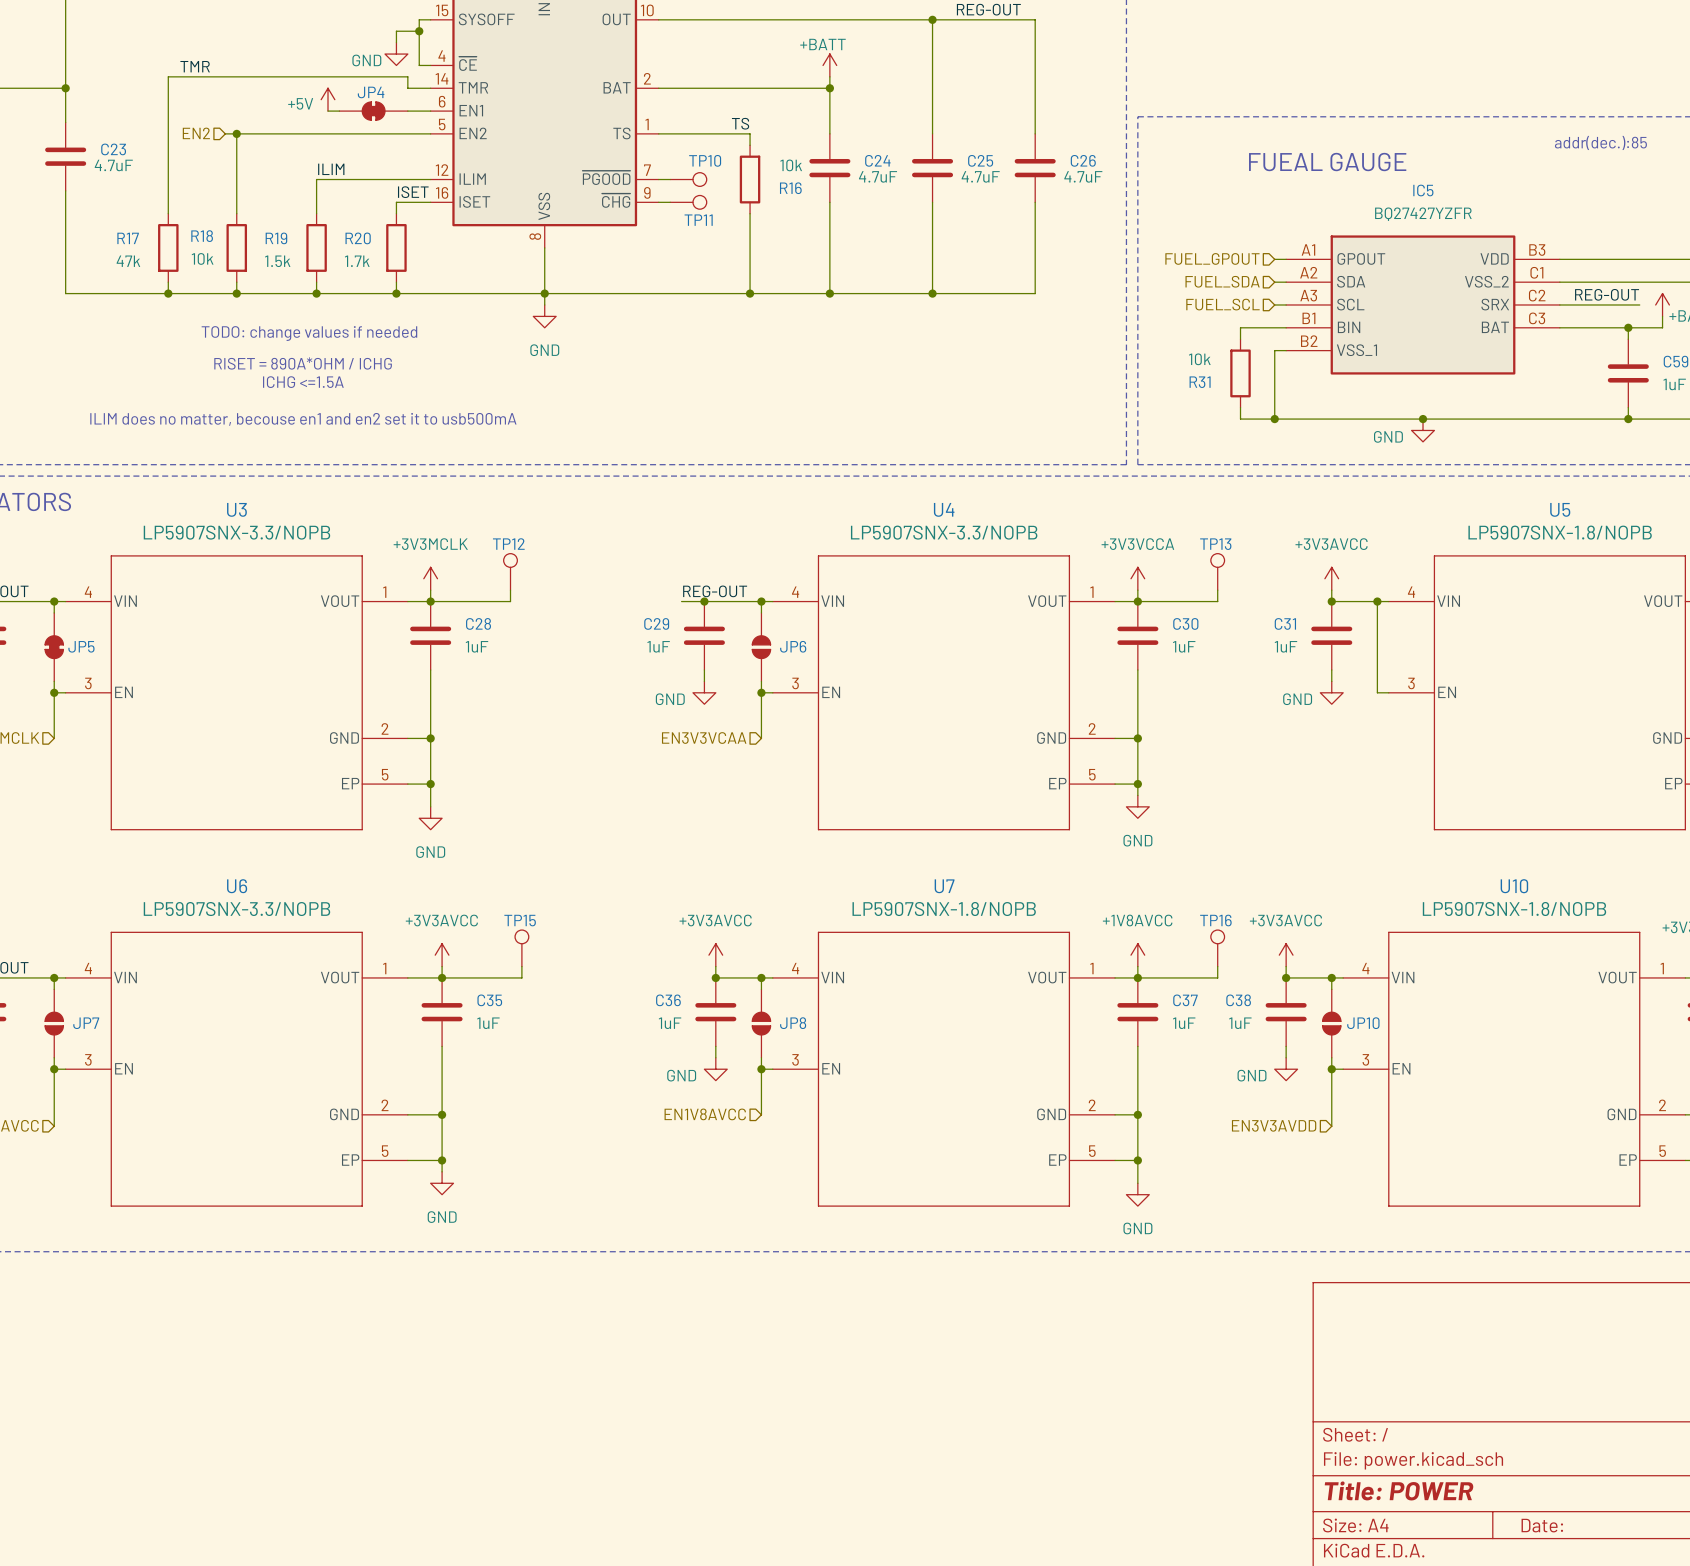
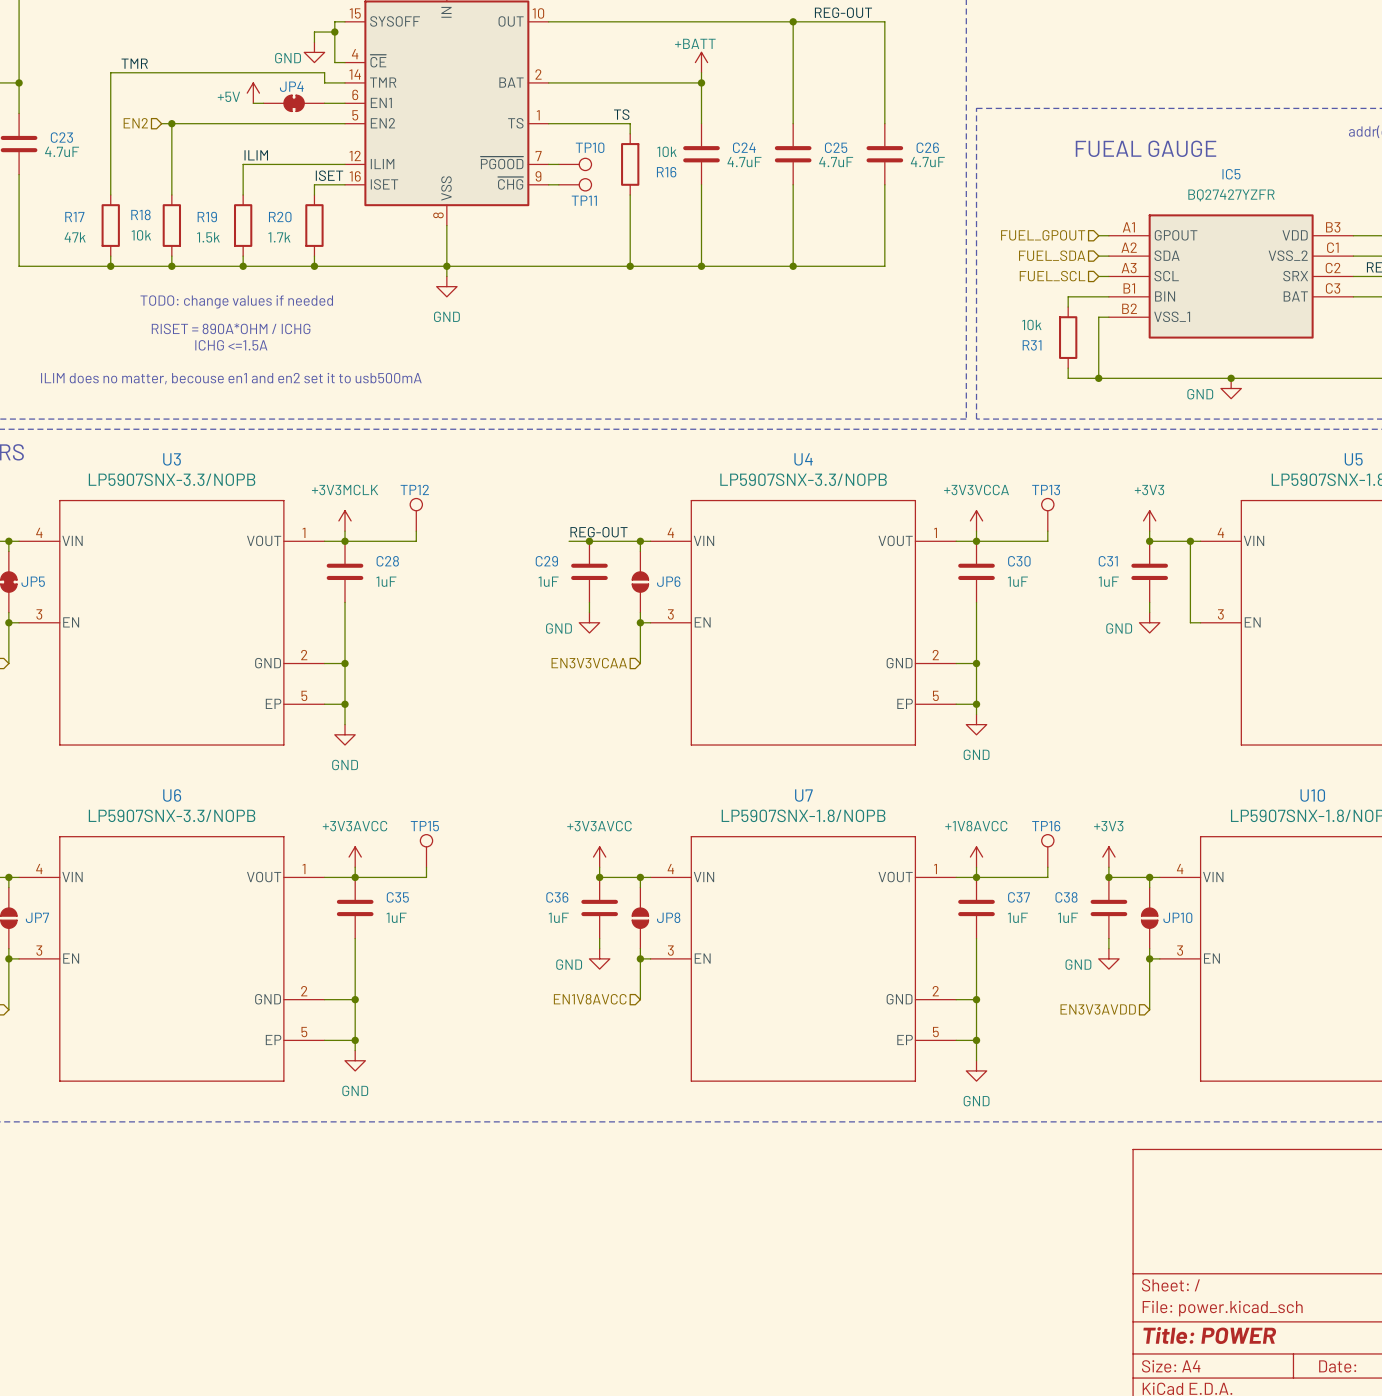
power symbol: +3V3AVCC (1331, 578) -> +3V3 (1149, 520)
power symbol: +3V3AVCC (1286, 955) -> +3V3 (1108, 857)

